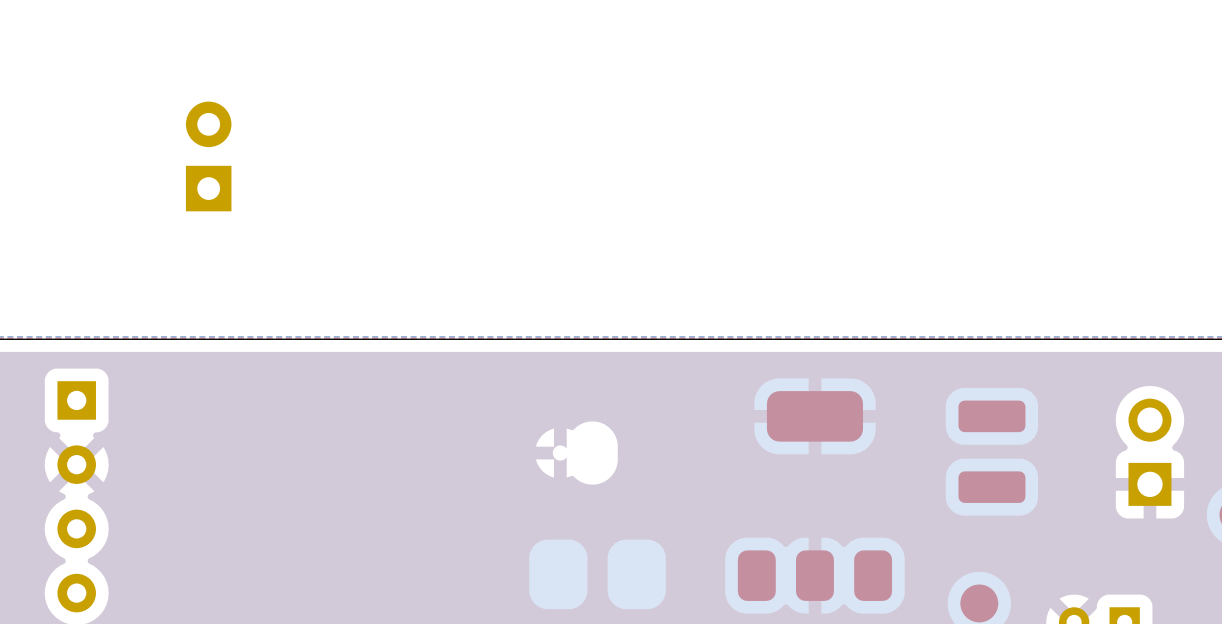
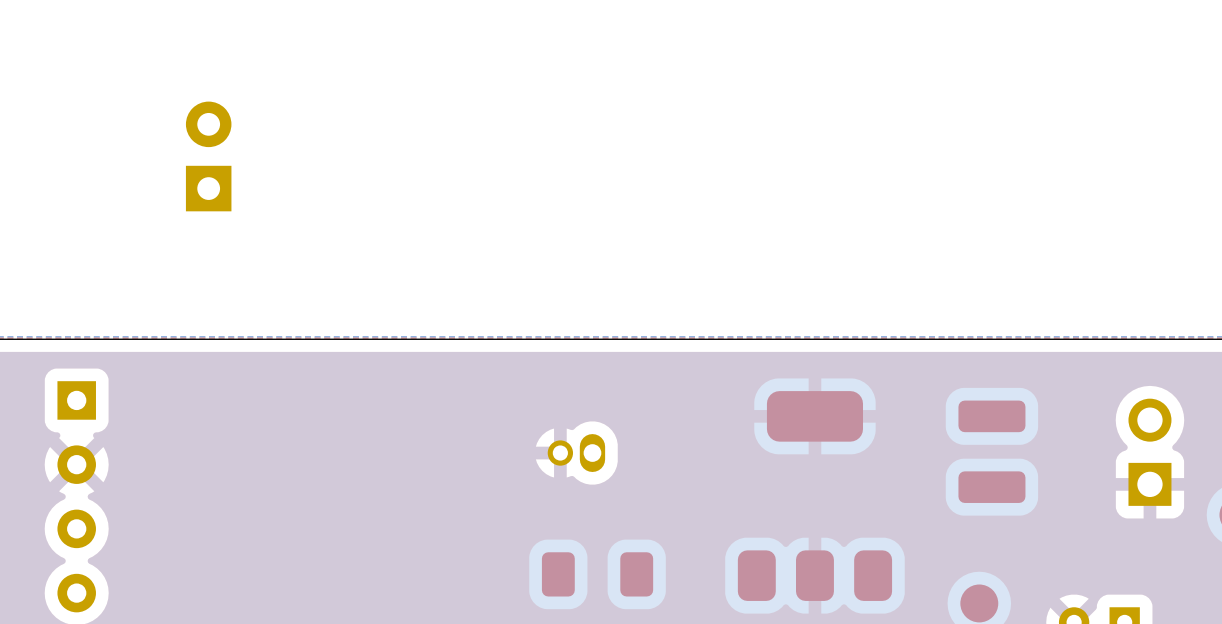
part: none -> (576, 453)
part: none -> (597, 574)

